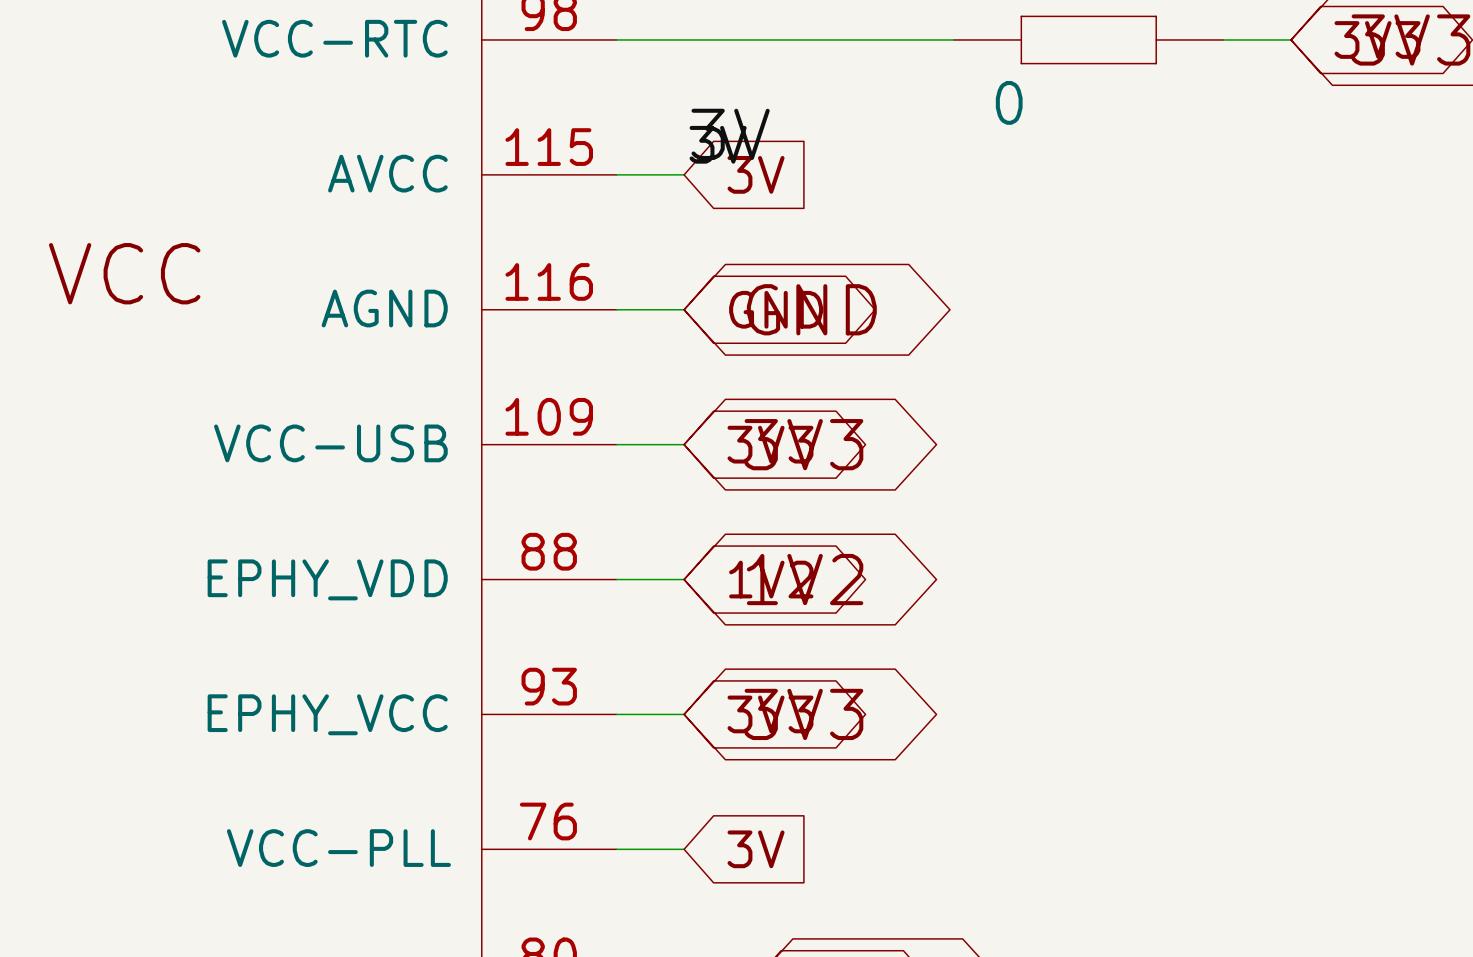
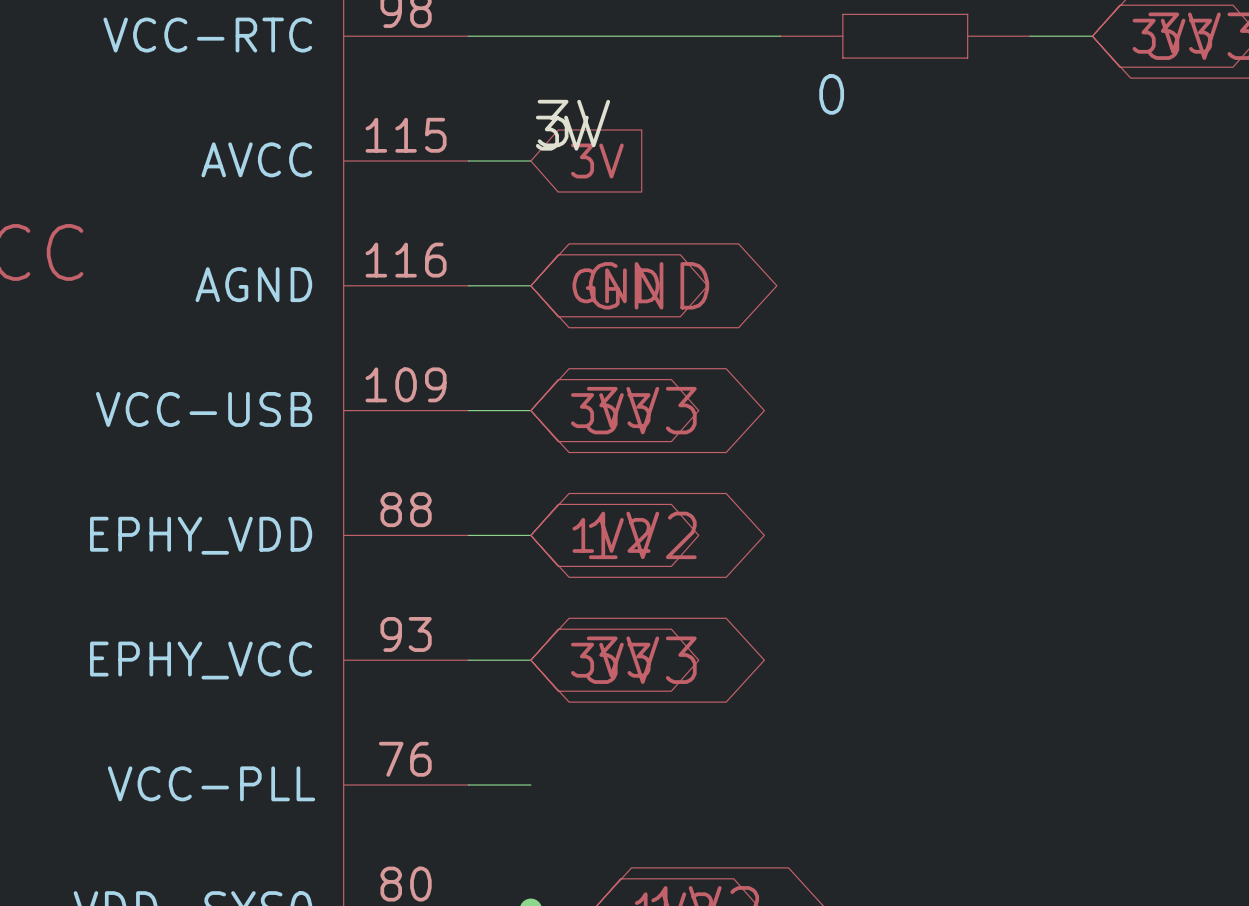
global label: 3V (756, 849) -> none

